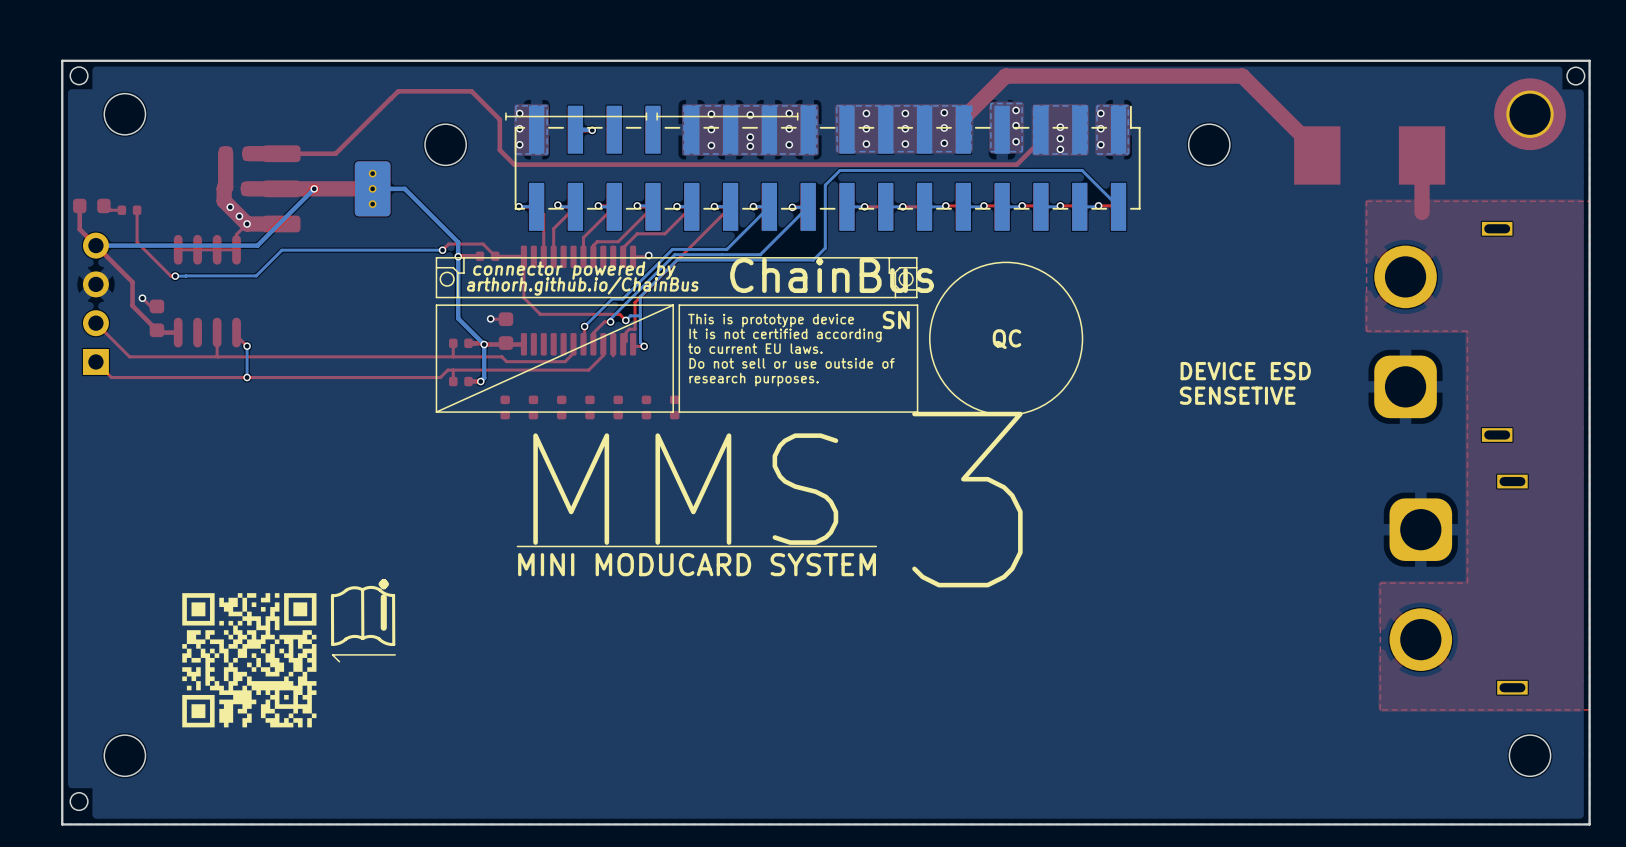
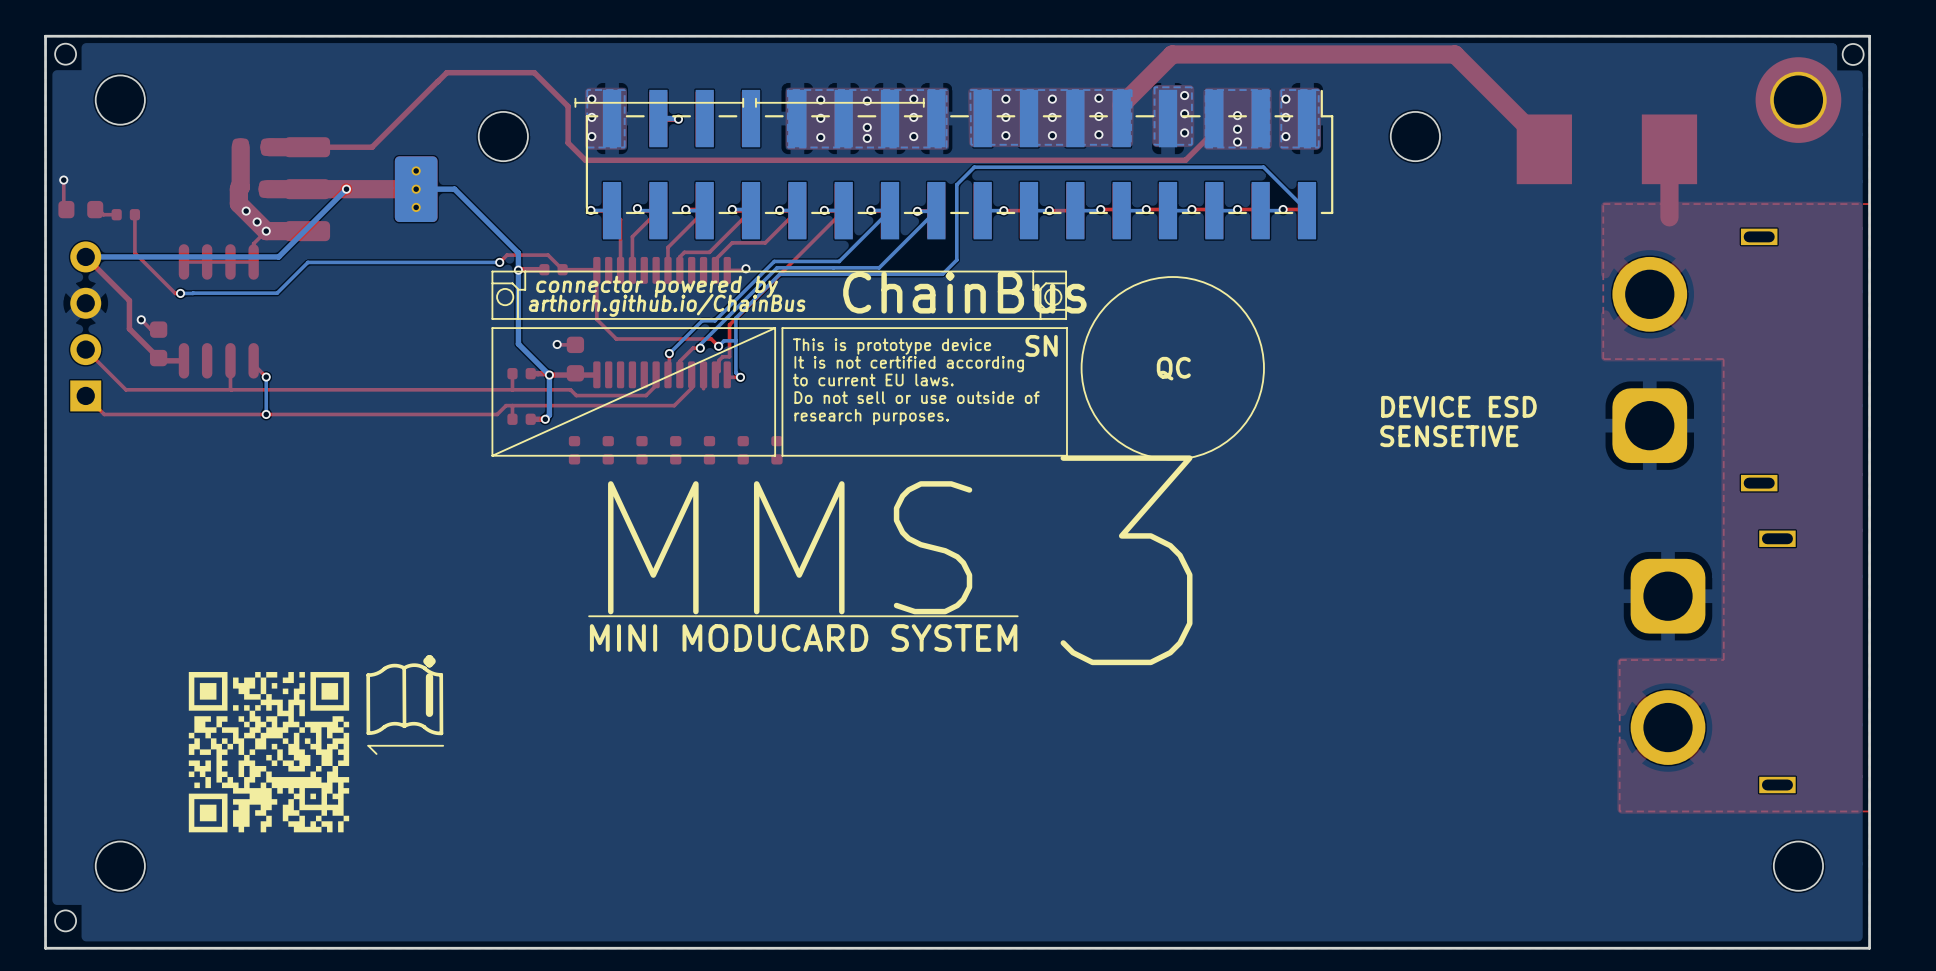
top track: none -> (63, 180) (63, 203)
via: none -> (63, 180)
top track: (79, 205) (79, 229) (95, 245) -> none

